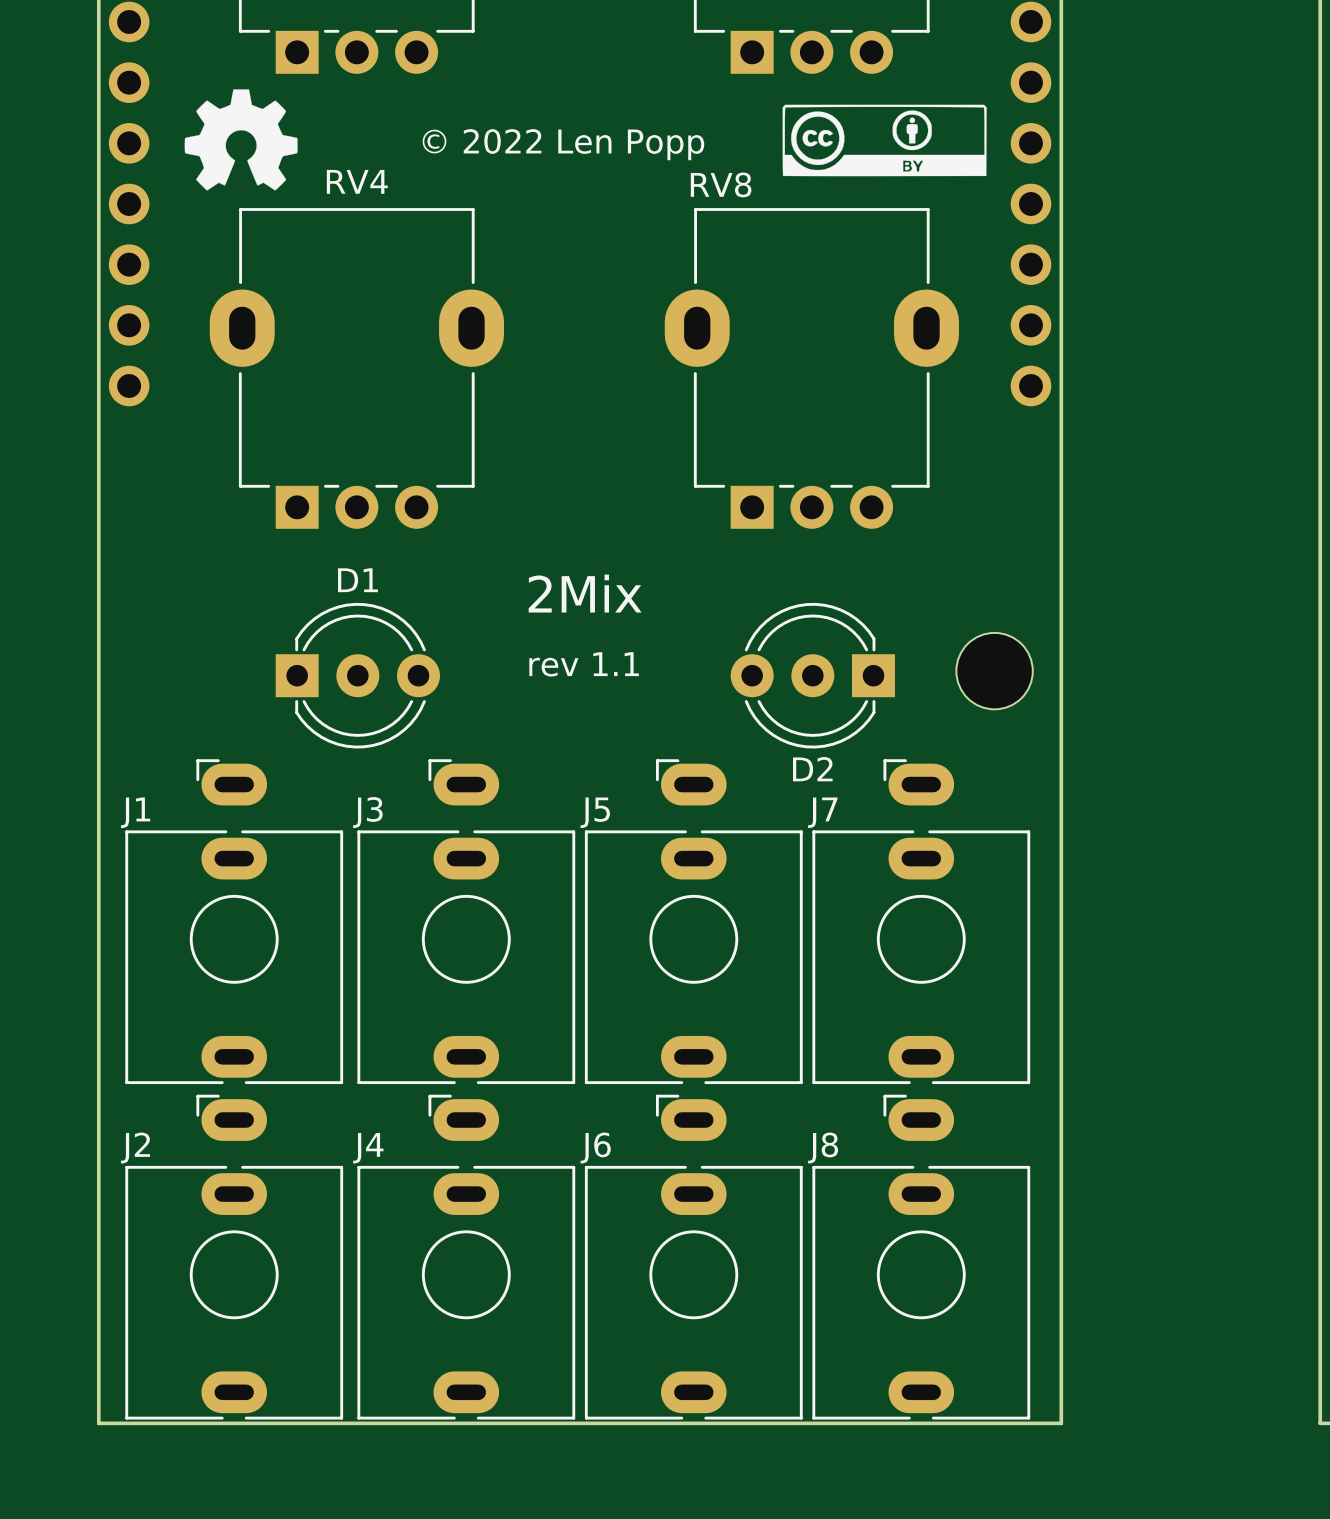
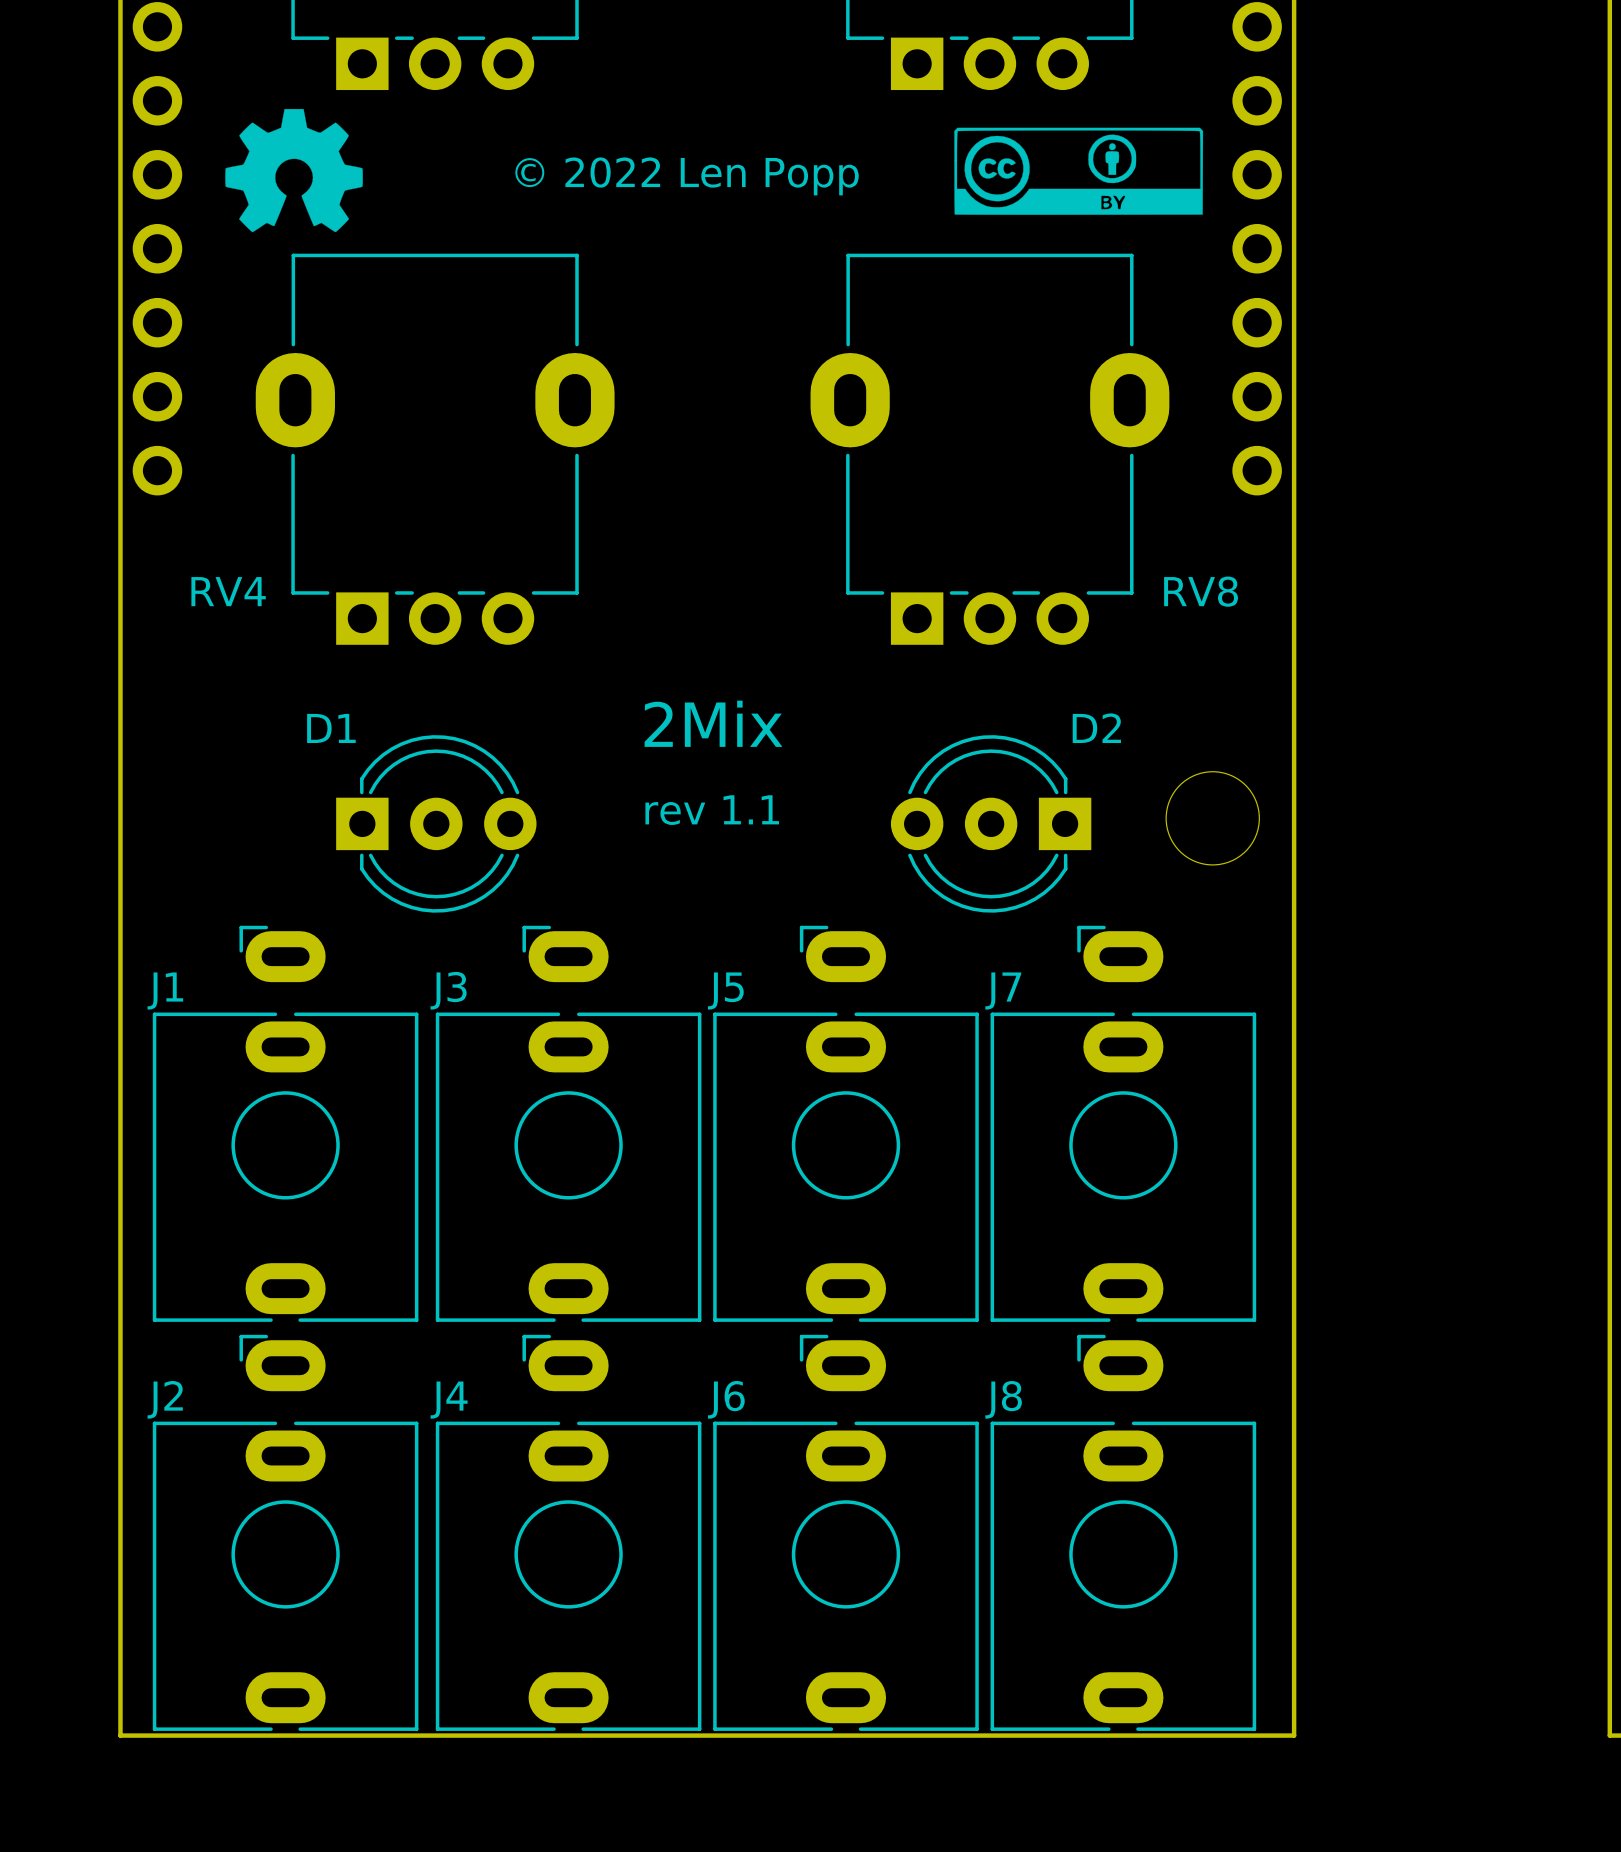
RV4 name position: RV4 (357, 181) -> RV4 (228, 591)
RV8 name position: RV8 (721, 184) -> RV8 (1201, 591)
D1 name position: D1 (357, 580) -> D1 (331, 728)
D2 name position: D2 (812, 769) -> D2 (1096, 728)

